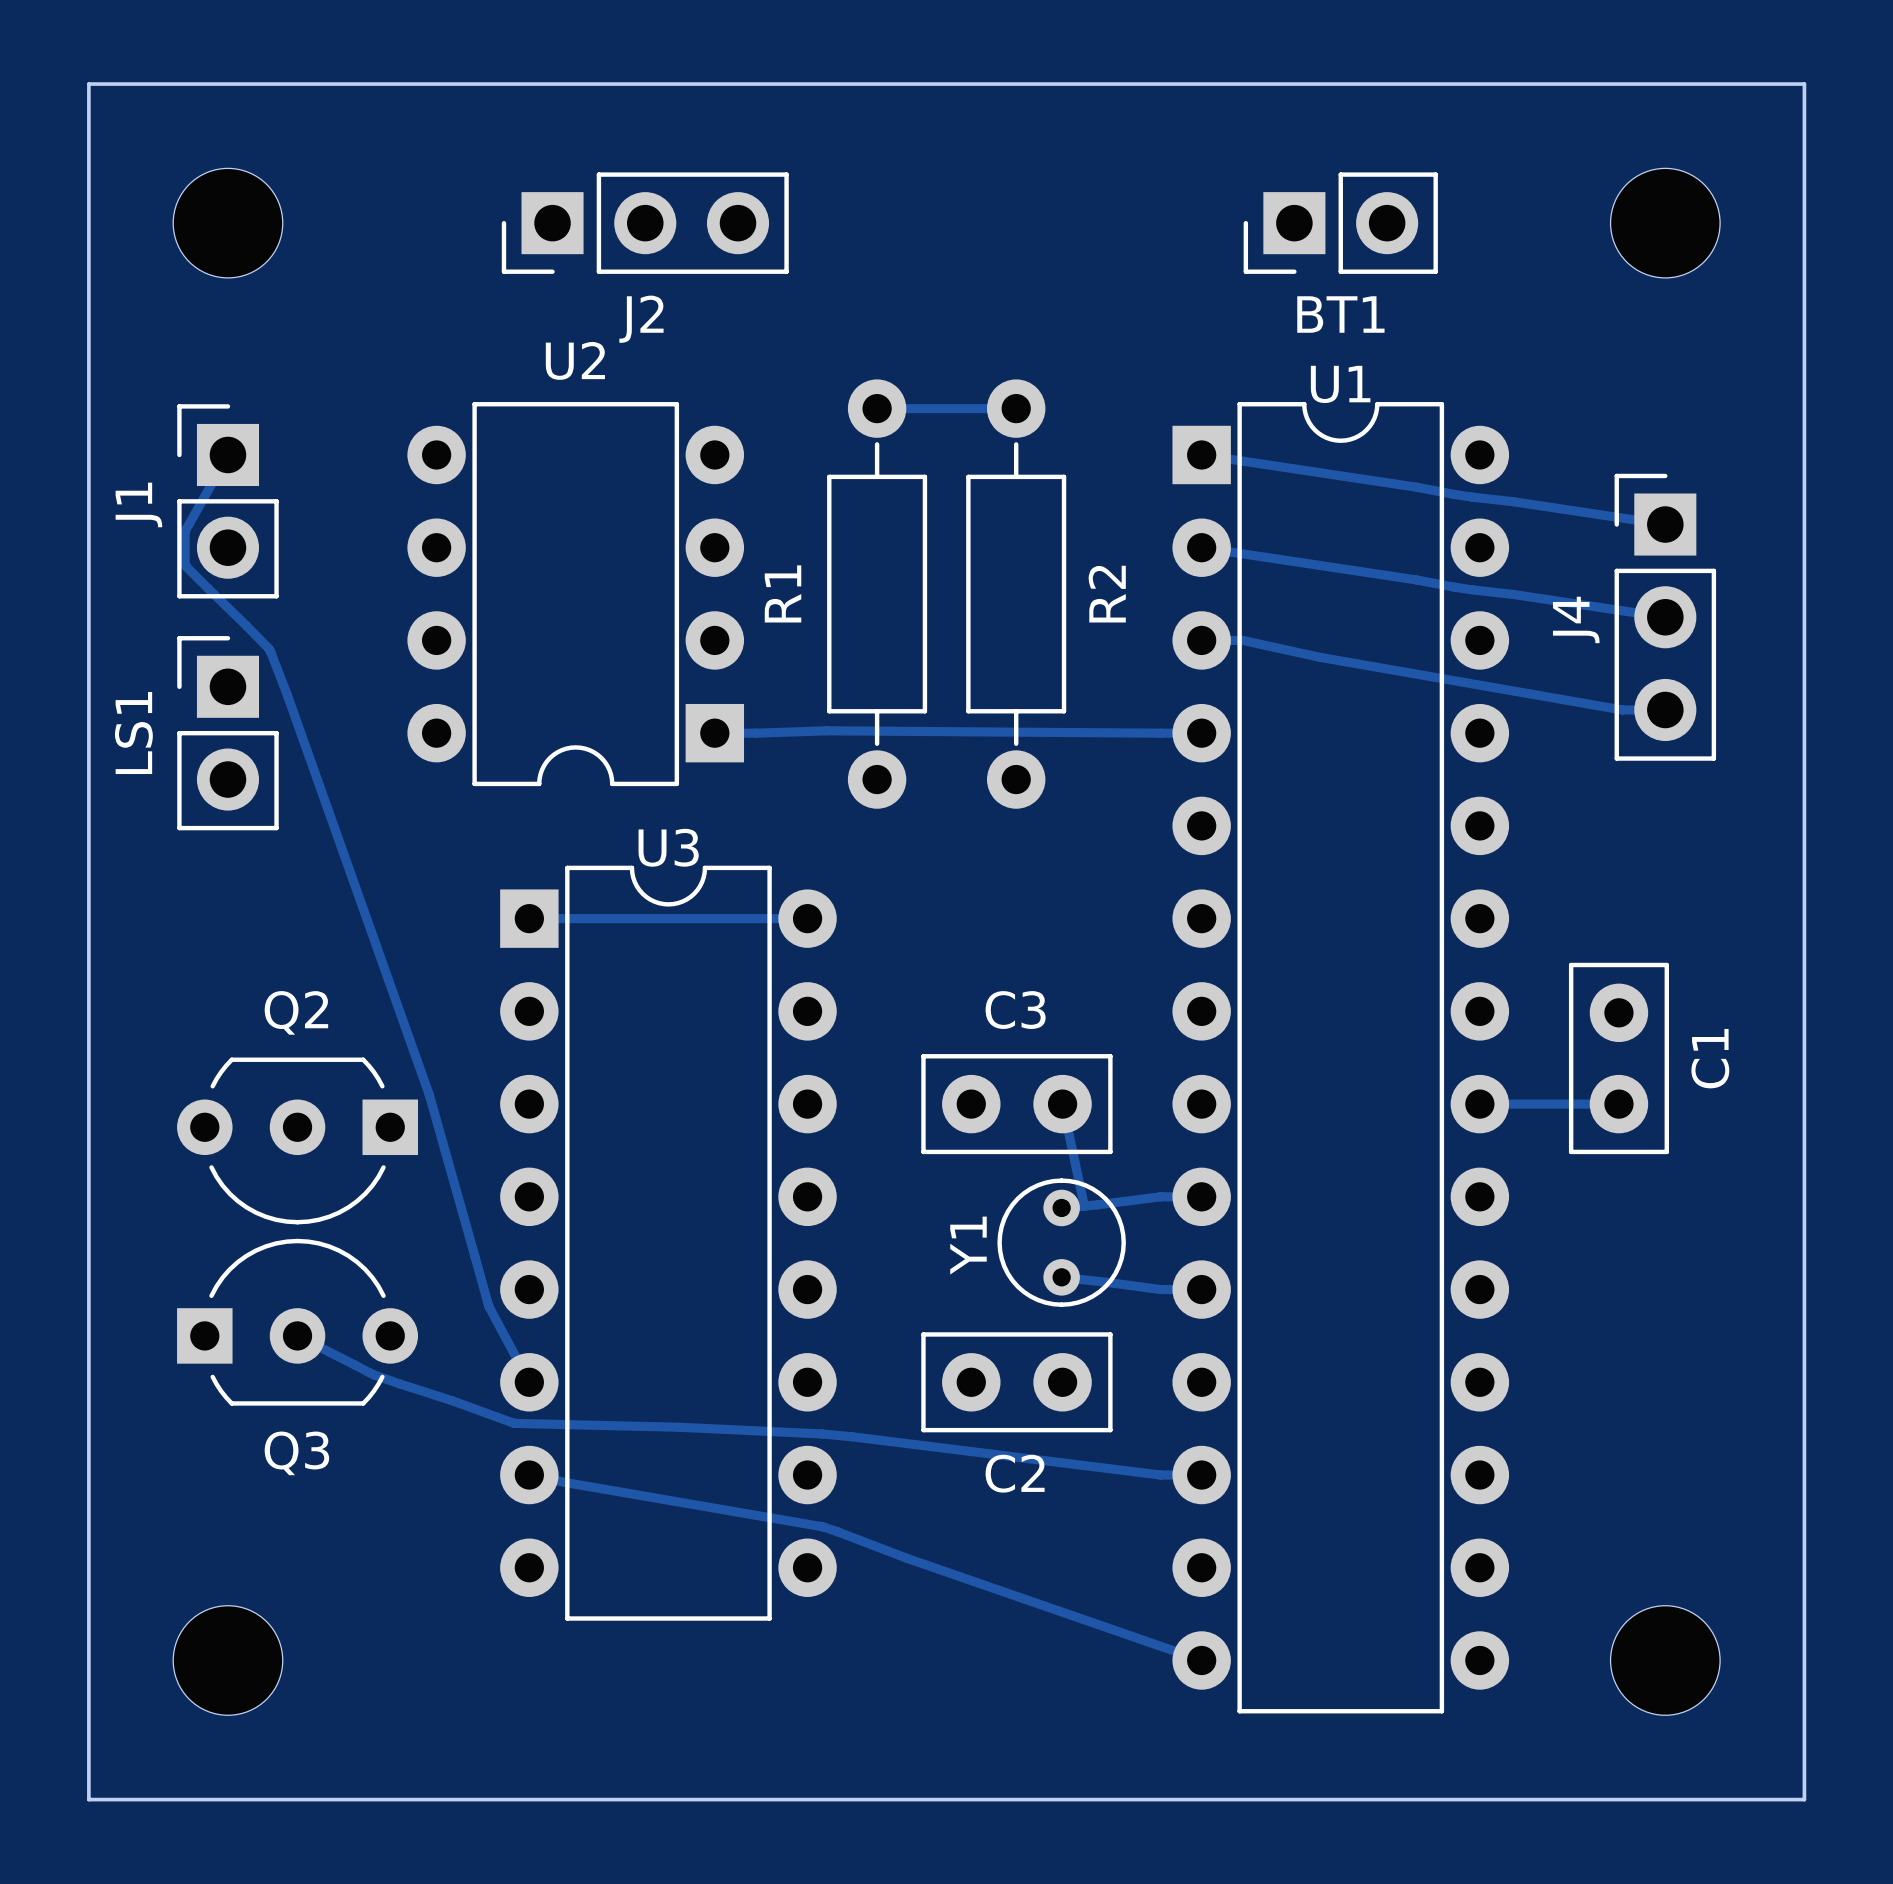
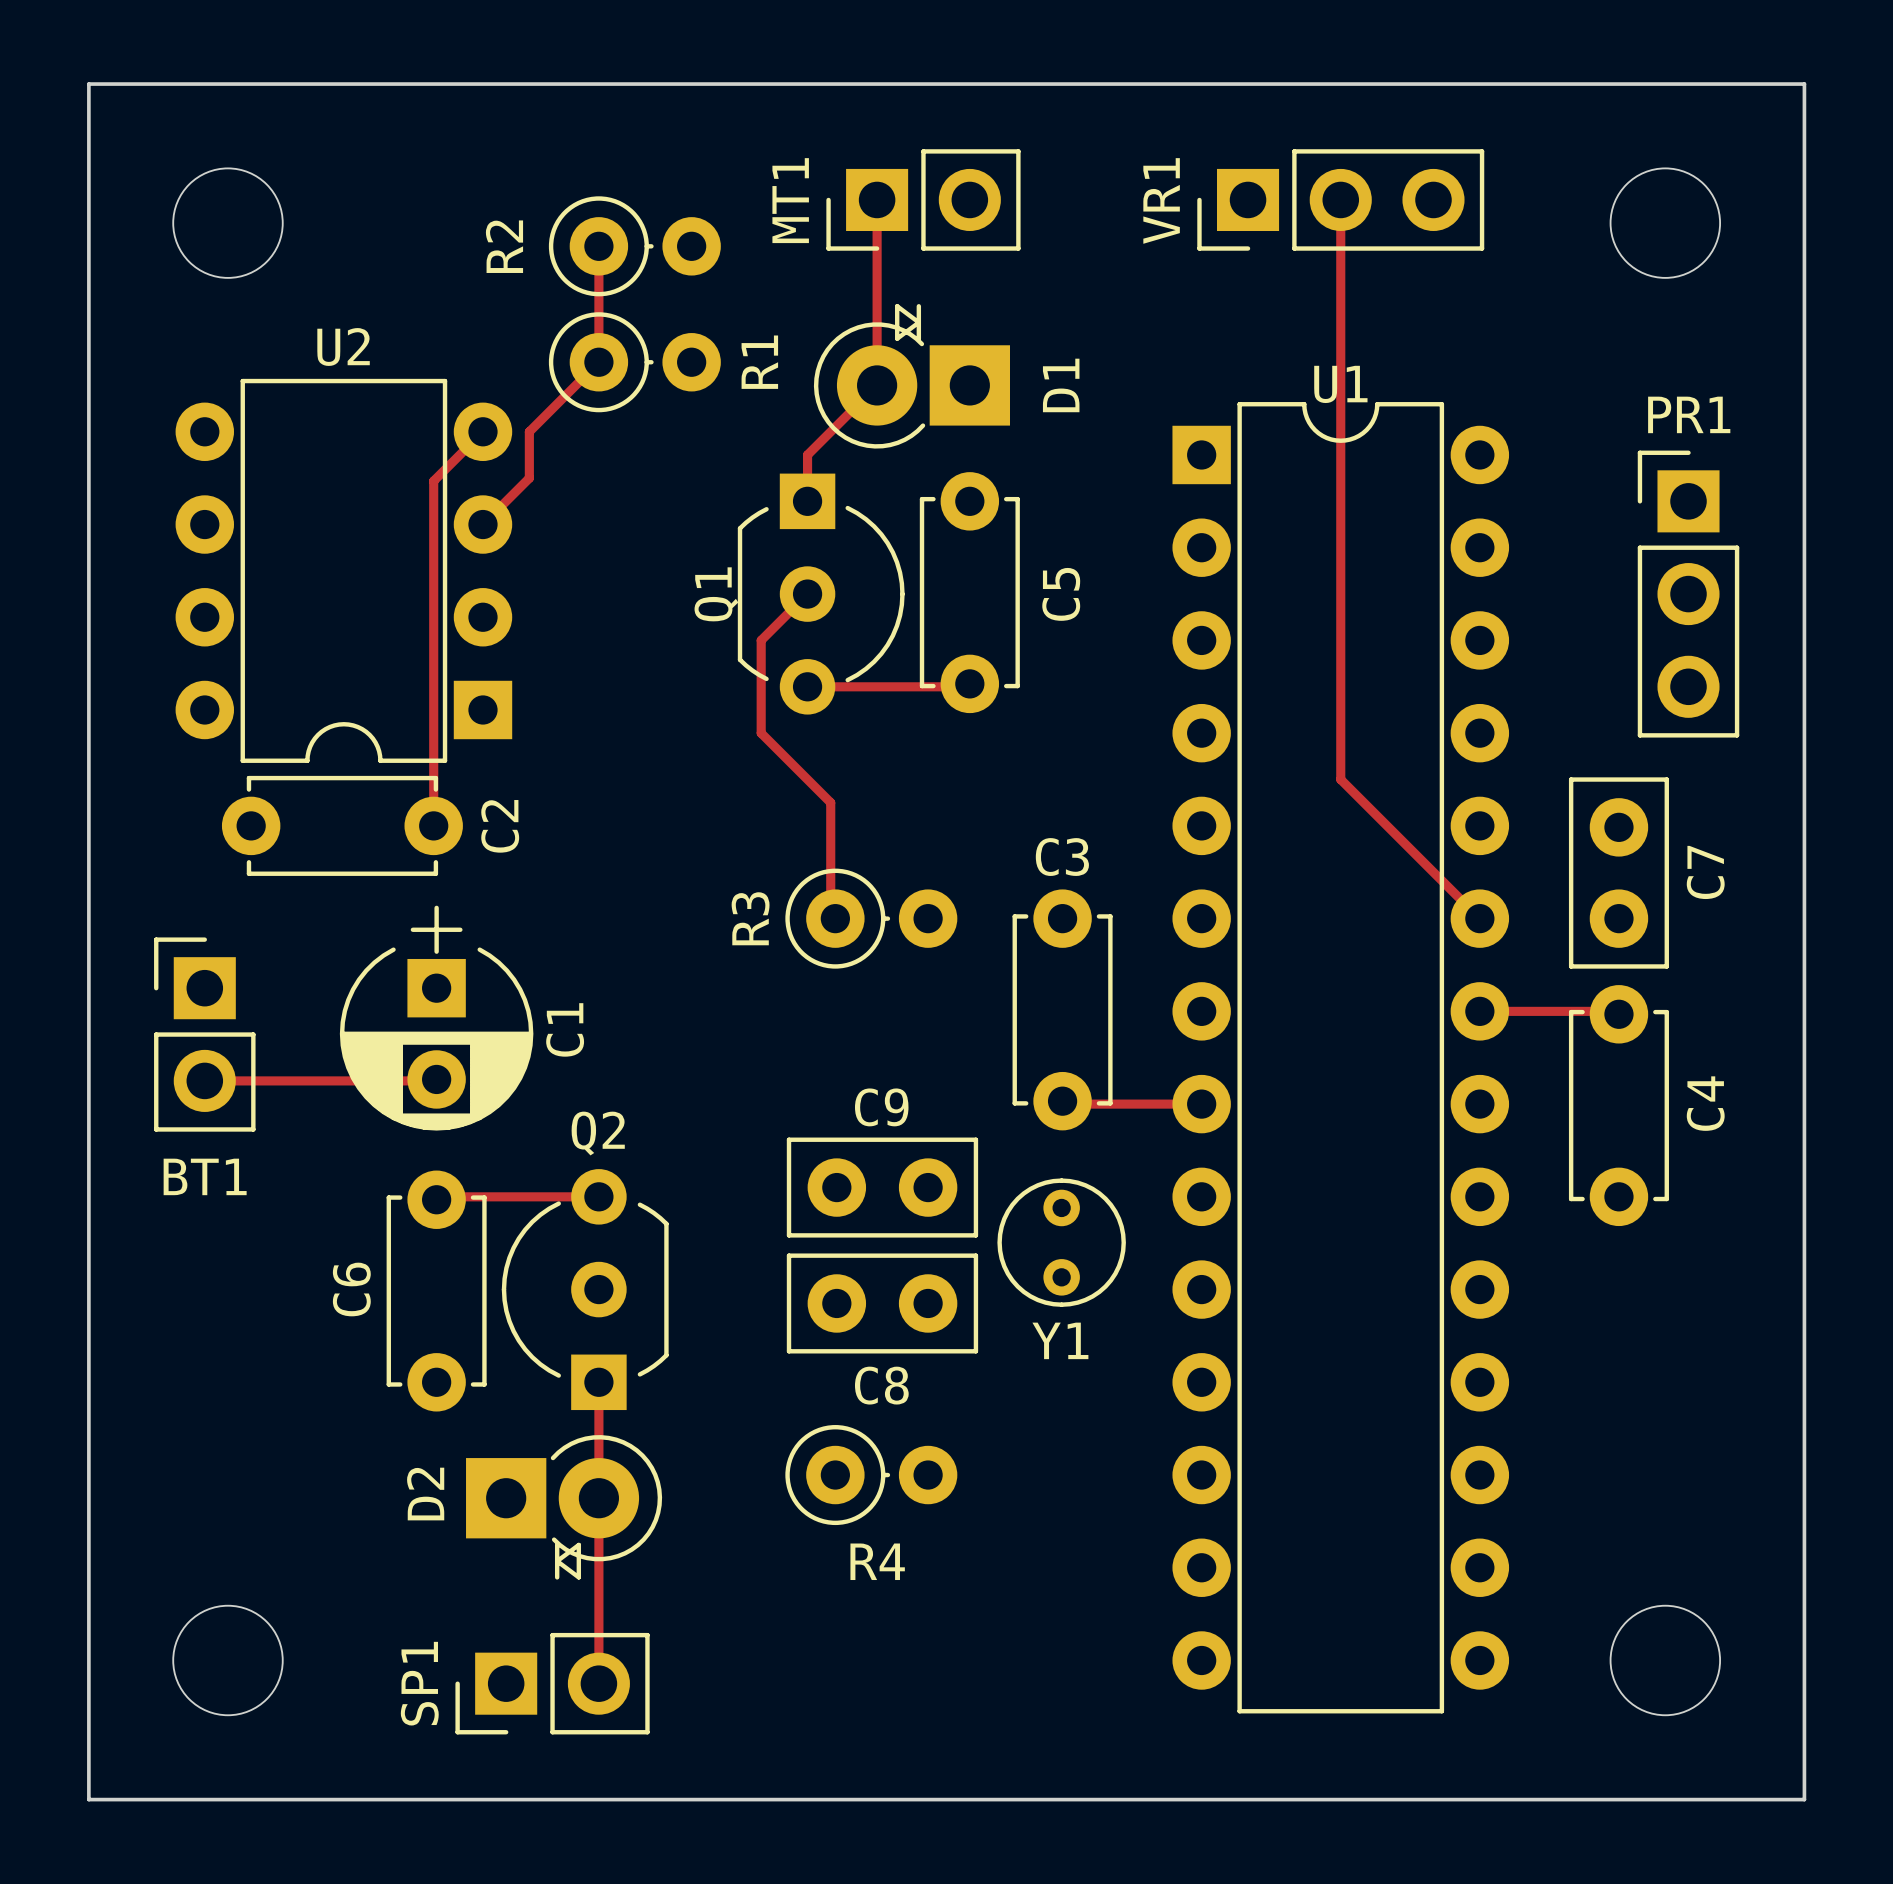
track: none -> (877, 199) (877, 385) (807, 454) (807, 501)
MT1: none -> (923, 199)
track: none -> (1340, 199) (1340, 779) (1479, 918)
VR1: none -> (1340, 199)
J2: (645, 223) -> none
BT1 rotation: 0° (1340, 223) -> 90° clockwise (204, 1034)
BT1 position: (1340, 223) -> (204, 1034)
track: none -> (598, 246) (598, 362) (529, 431) (529, 478) (482, 524)
U2 name position: U2 (575, 360) -> U2 (343, 347)
D1: none -> (911, 376)
R1 footprint: [827, 379, 928, 809] -> [548, 312, 721, 413]
R2 footprint: [966, 379, 1067, 809] -> [548, 196, 721, 297]
track: (877, 408) (1016, 408) -> none
track: none -> (482, 431) (433, 481) (433, 825)
track: (227, 454) (185, 531) (185, 564) (270, 652) (429, 1094) (488, 1305) (529, 1382) -> none
track: (1201, 454) (1471, 497) (1665, 524) -> none
J1: (227, 501) -> none
track: (1201, 547) (1471, 589) (1665, 617) -> none
C5: none -> (969, 592)
R1 name position: R1 (783, 593) -> R1 (759, 362)
U2 position: (575, 594) -> (343, 570)
track: none -> (807, 594) (761, 640) (761, 733) (830, 802) (830, 918) (835, 918)
Q1: none -> (821, 594)
R2 name position: R2 (1107, 594) -> R2 (504, 246)
J4 position: (1665, 617) -> (1688, 594)
J4 name: J4 (1576, 619) -> PR1 (1689, 414)
track: (1201, 640) (1242, 640) (1319, 657) (1622, 709) (1665, 709) -> none
track: none -> (969, 683) (966, 686) (807, 686)
LS1: (227, 733) -> none
track: (714, 733) (826, 730) (1201, 733) -> none
C7: none -> (1618, 873)
track: (529, 918) (807, 918) -> none
R3: none -> (871, 918)
C1 footprint: [1568, 962, 1669, 1155] -> [339, 905, 534, 1131]
track: none -> (1479, 1011) (1616, 1011) (1618, 1014)
C3 footprint: [921, 1054, 1113, 1155] -> [1012, 889, 1113, 1131]
track: none -> (436, 1079) (204, 1080)
track: none -> (1062, 1101) (1065, 1104) (1201, 1104)
track: (1062, 1104) (1084, 1206) -> none
track: (1479, 1104) (1618, 1104) -> none
C4: none -> (1618, 1105)
Q2 rotation: 0° (297, 1140) -> 90° clockwise (585, 1289)
Q2 position: (297, 1140) -> (585, 1289)
C9: none -> (882, 1187)
track: none -> (598, 1196) (439, 1196) (436, 1199)
track: (1201, 1196) (1160, 1196) (1084, 1206) -> none
U3: (668, 1243) -> none
Y1 name rotation: 0° (968, 1245) -> 90° clockwise (1060, 1340)
Y1 name position: Y1 (968, 1245) -> Y1 (1060, 1340)
track: (1061, 1277) (1160, 1289) (1201, 1289) -> none
C6: none -> (436, 1291)
C8: none -> (882, 1303)
Q3: (297, 1322) -> none
C2 footprint: [921, 1332, 1113, 1433] -> [221, 775, 463, 876]
track: (297, 1335) (374, 1374) (514, 1423) (679, 1427) (822, 1433) (1160, 1475) (1201, 1475) -> none
track: none -> (598, 1382) (598, 1683)
C2 name position: C2 (1015, 1473) -> C2 (500, 826)
track: (529, 1475) (823, 1526) (906, 1558) (1201, 1660) -> none
R4: none -> (871, 1475)
D2: none -> (564, 1507)
SP1: none -> (552, 1683)

